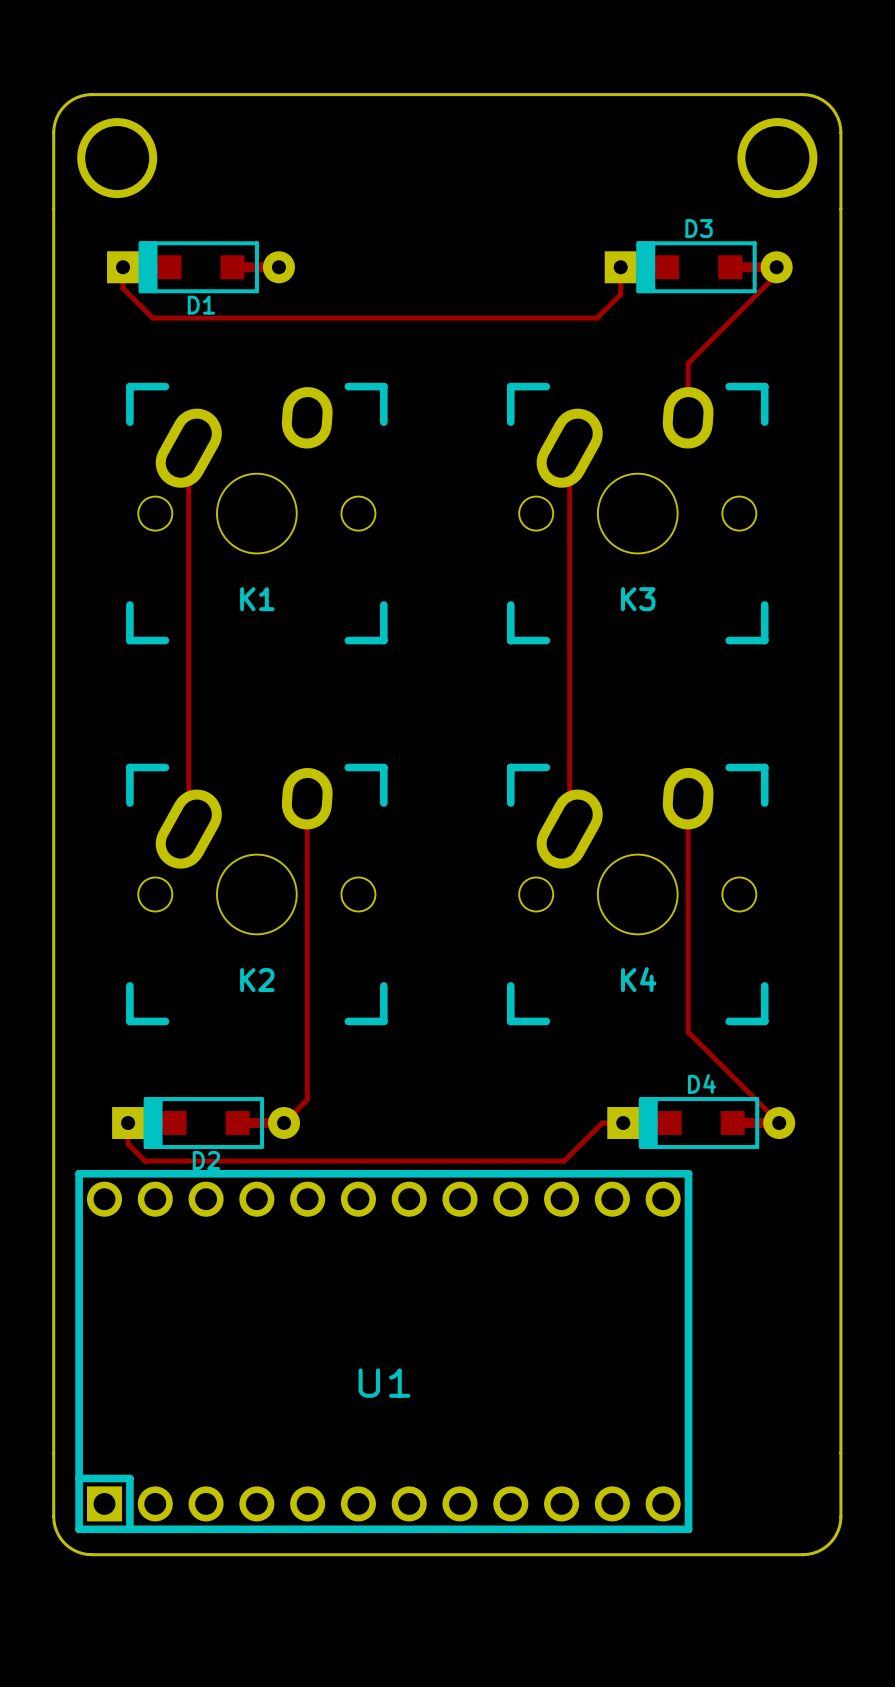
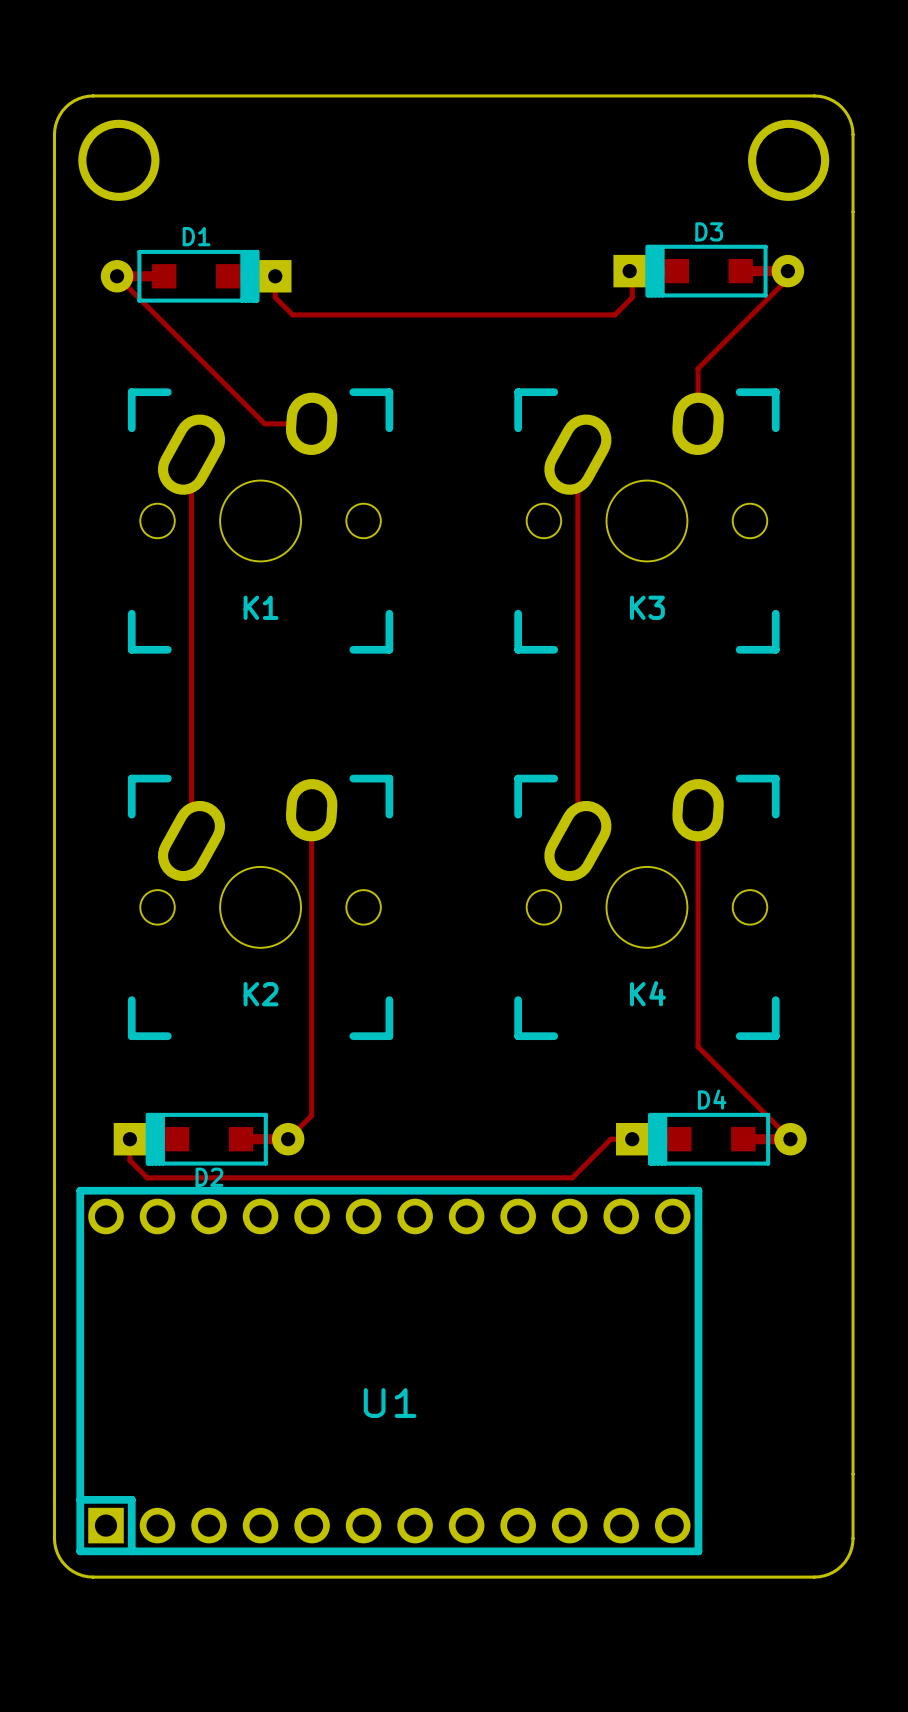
track: (123, 267) (123, 288) (152, 318) (597, 318) (620, 294) (620, 267) -> none
D1 rotation: 0° (200, 267) -> 180° (196, 276)
track: none -> (117, 276) (264, 423) (311, 423)
track: none -> (275, 276) (275, 297) (292, 314) (614, 314) (632, 297) (632, 276)

